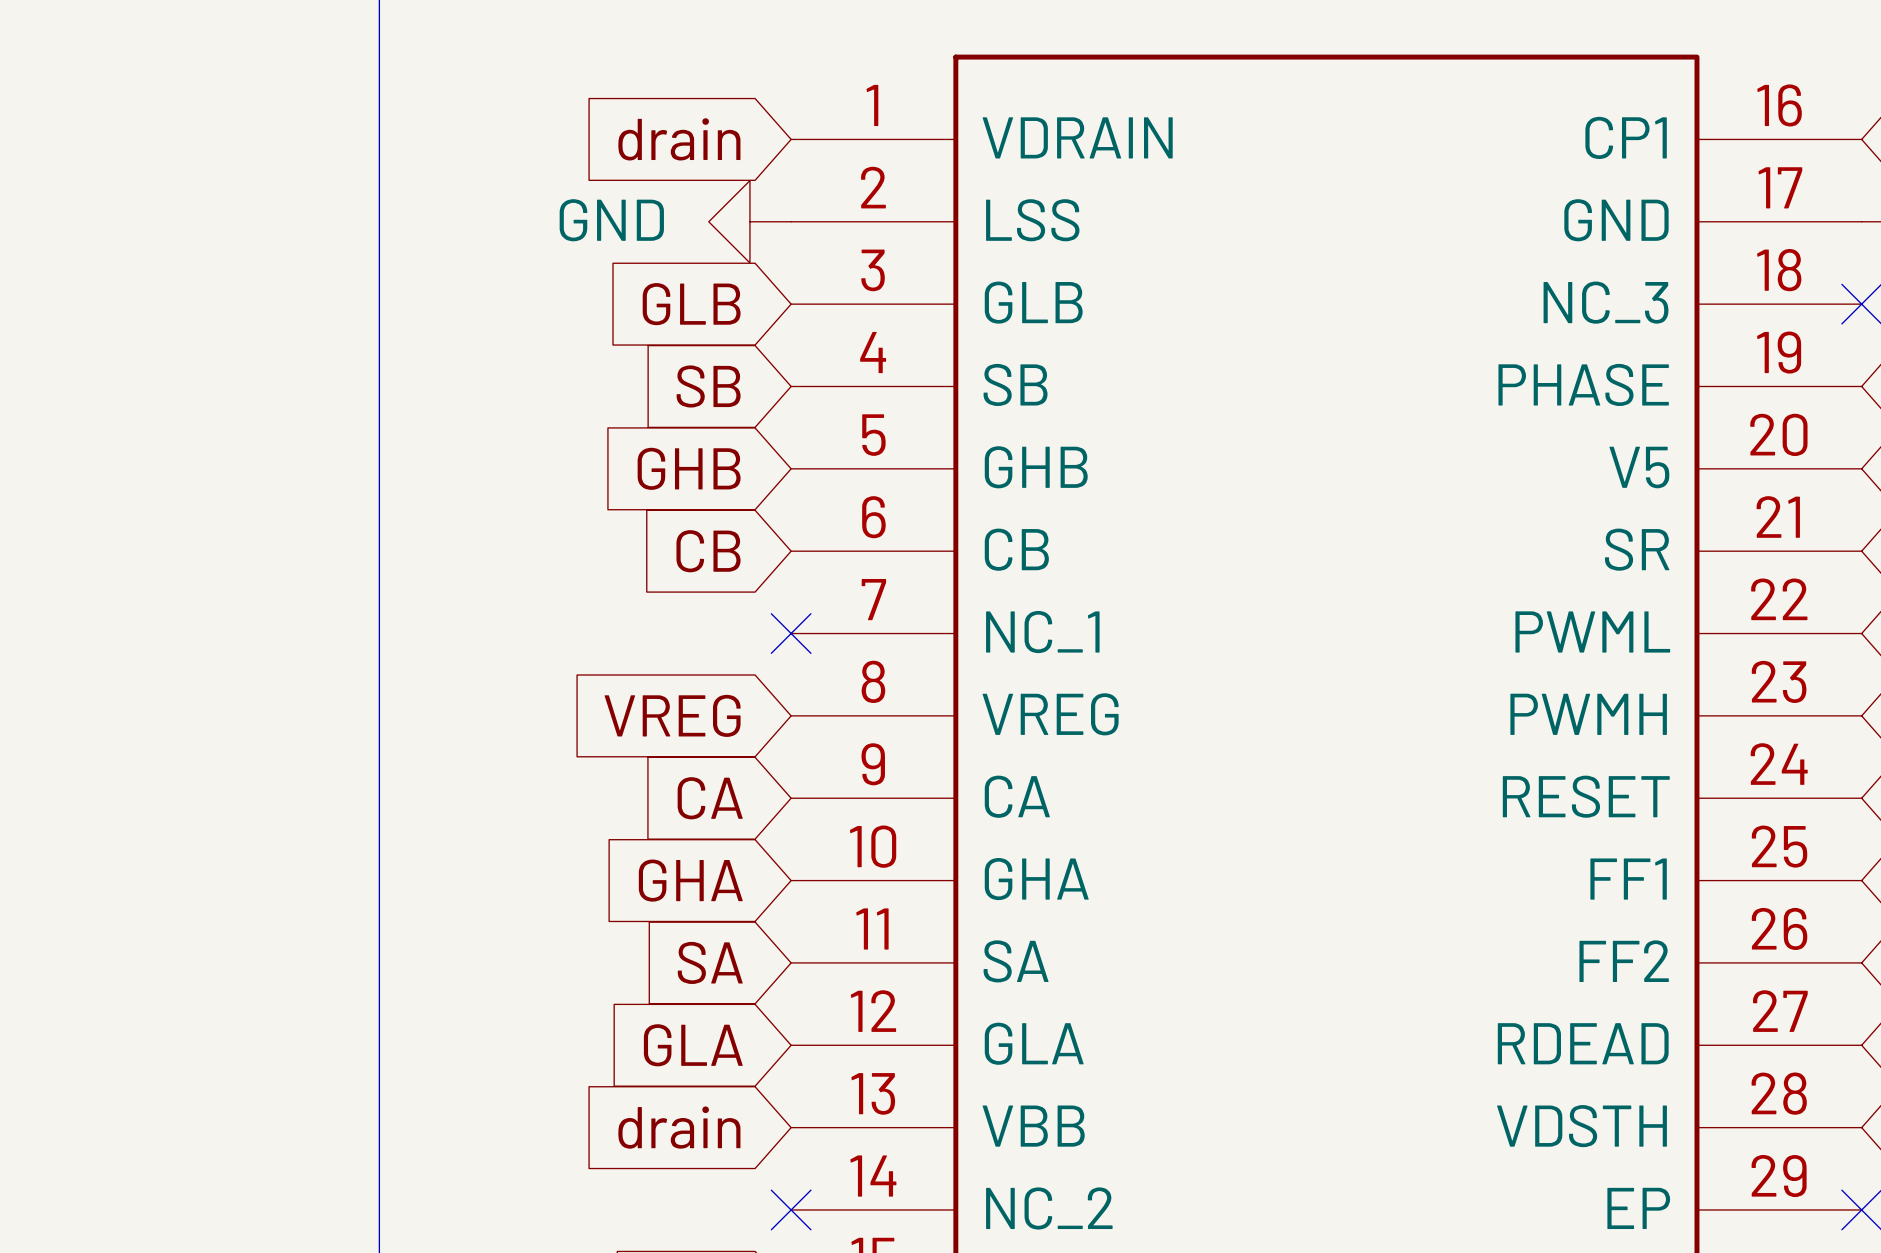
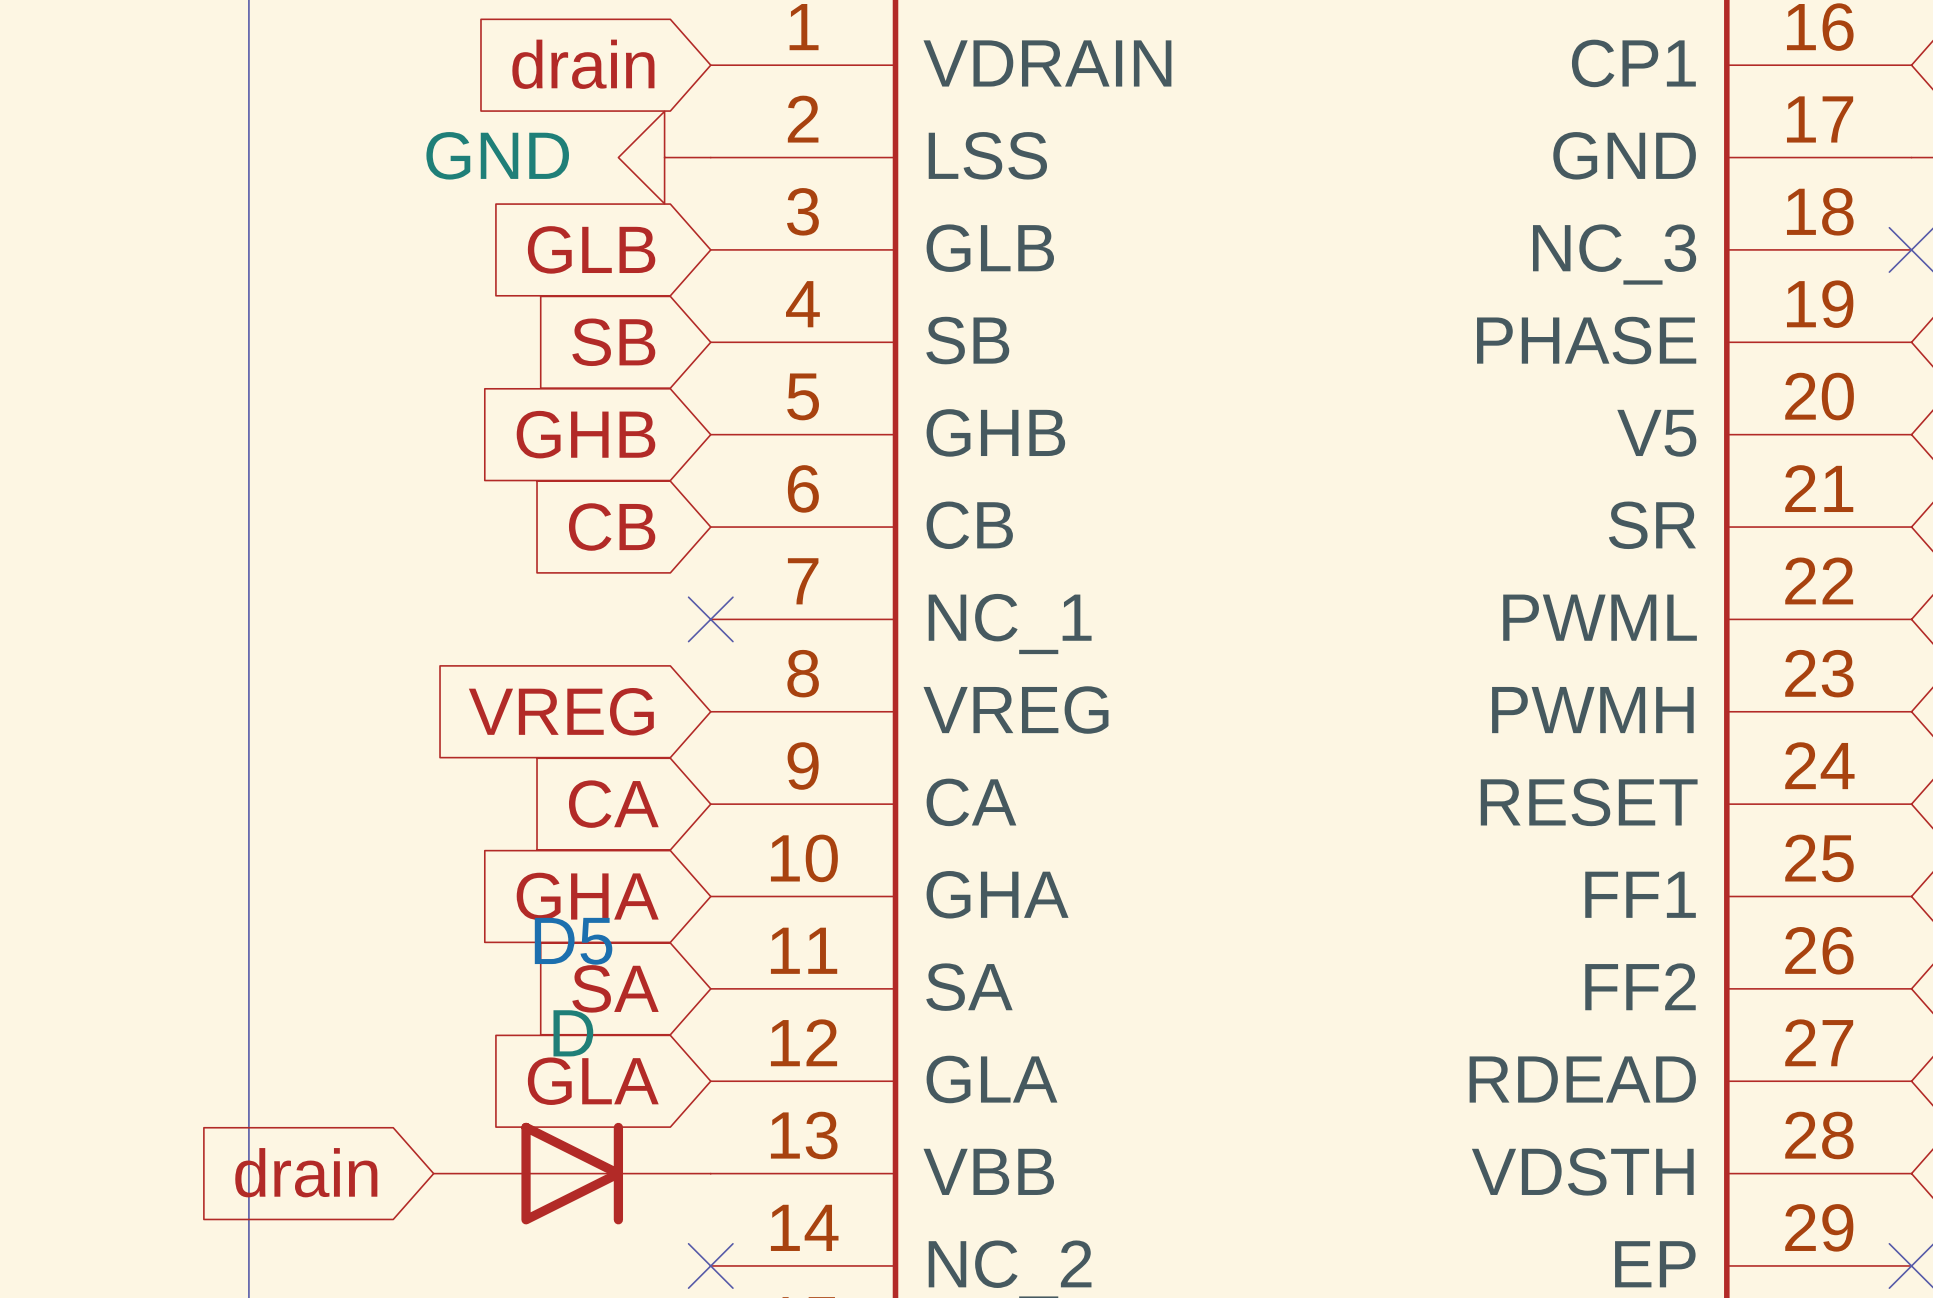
D5: none -> D (572, 1173)
global label position: drain (679, 1127) -> drain (306, 1172)

